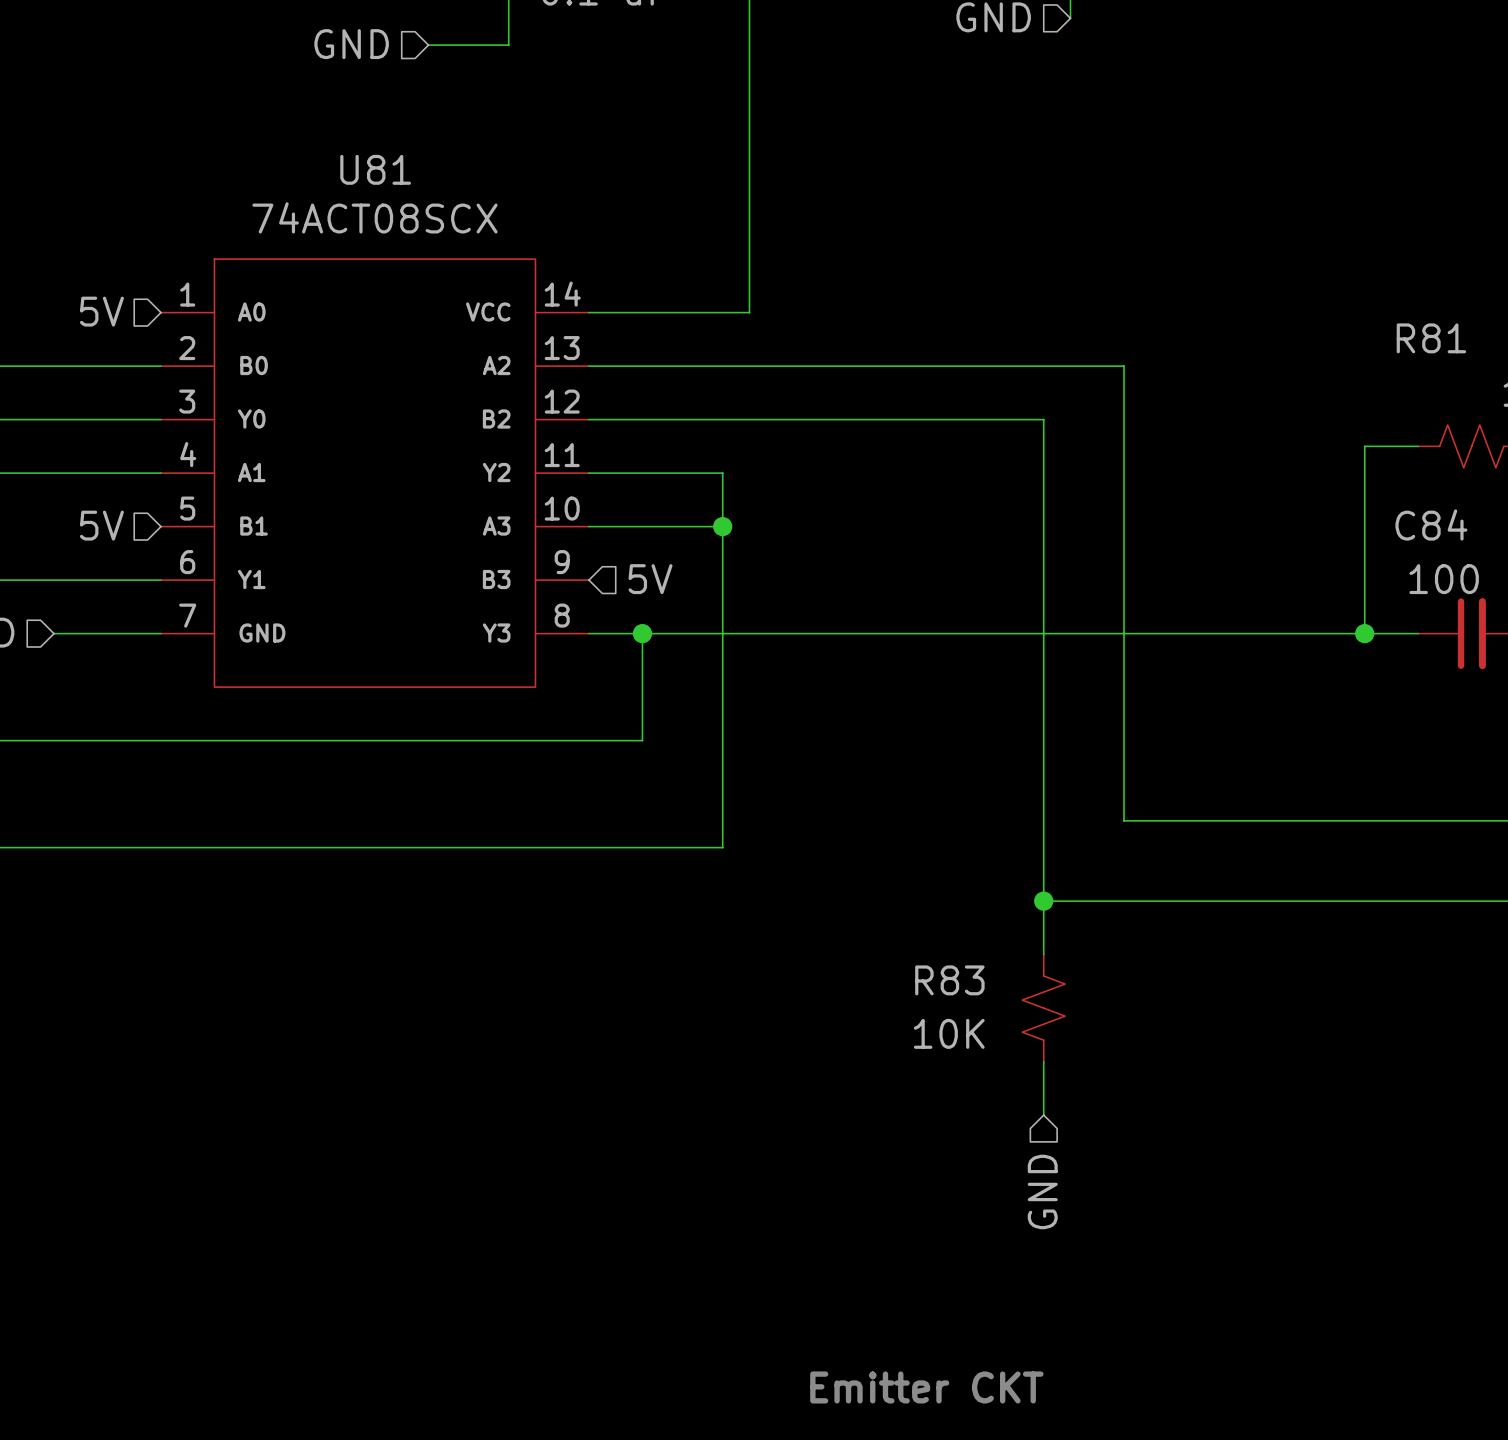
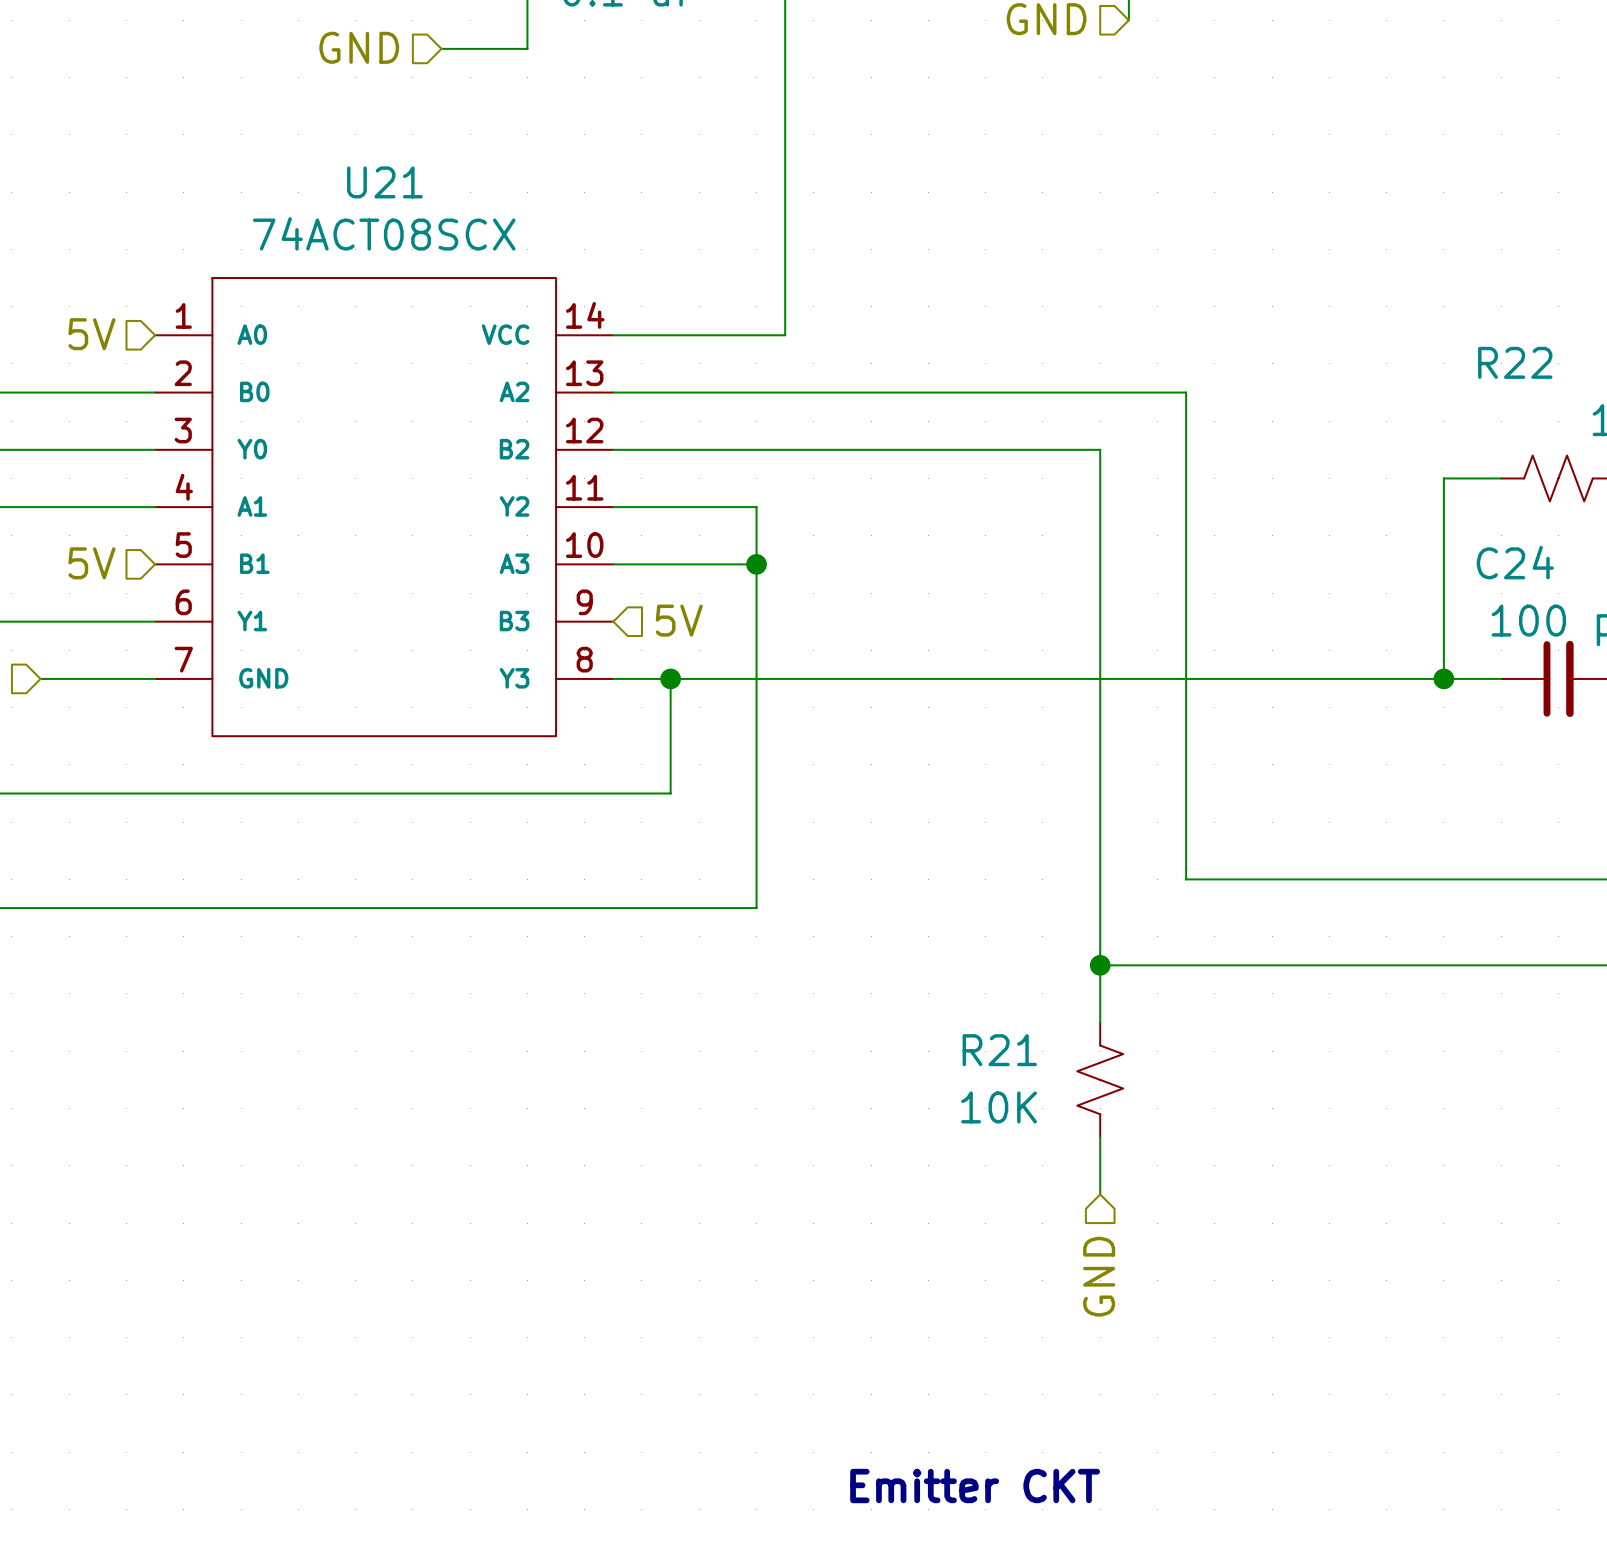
U81 name: U81 (375, 169) -> U21 (384, 182)
R81 name: R81 (1431, 338) -> R22 (1515, 362)
C84 name: C84 (1431, 524) -> C24 (1515, 562)
R83 name: R83 (949, 980) -> R21 (999, 1050)

